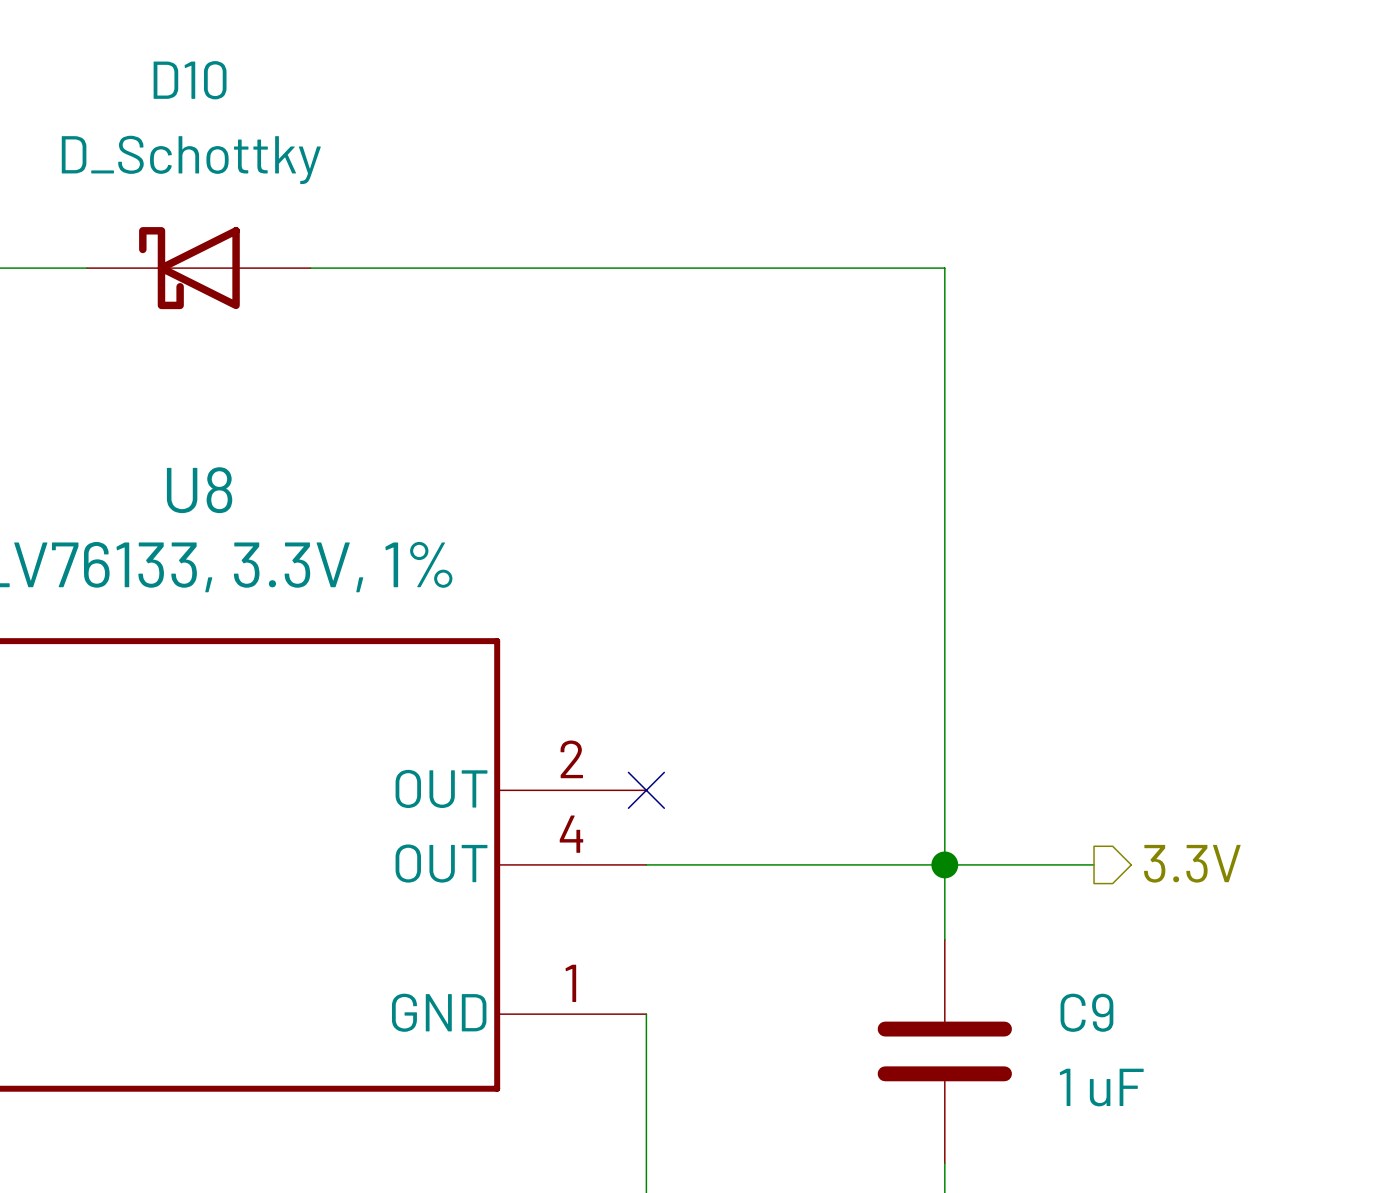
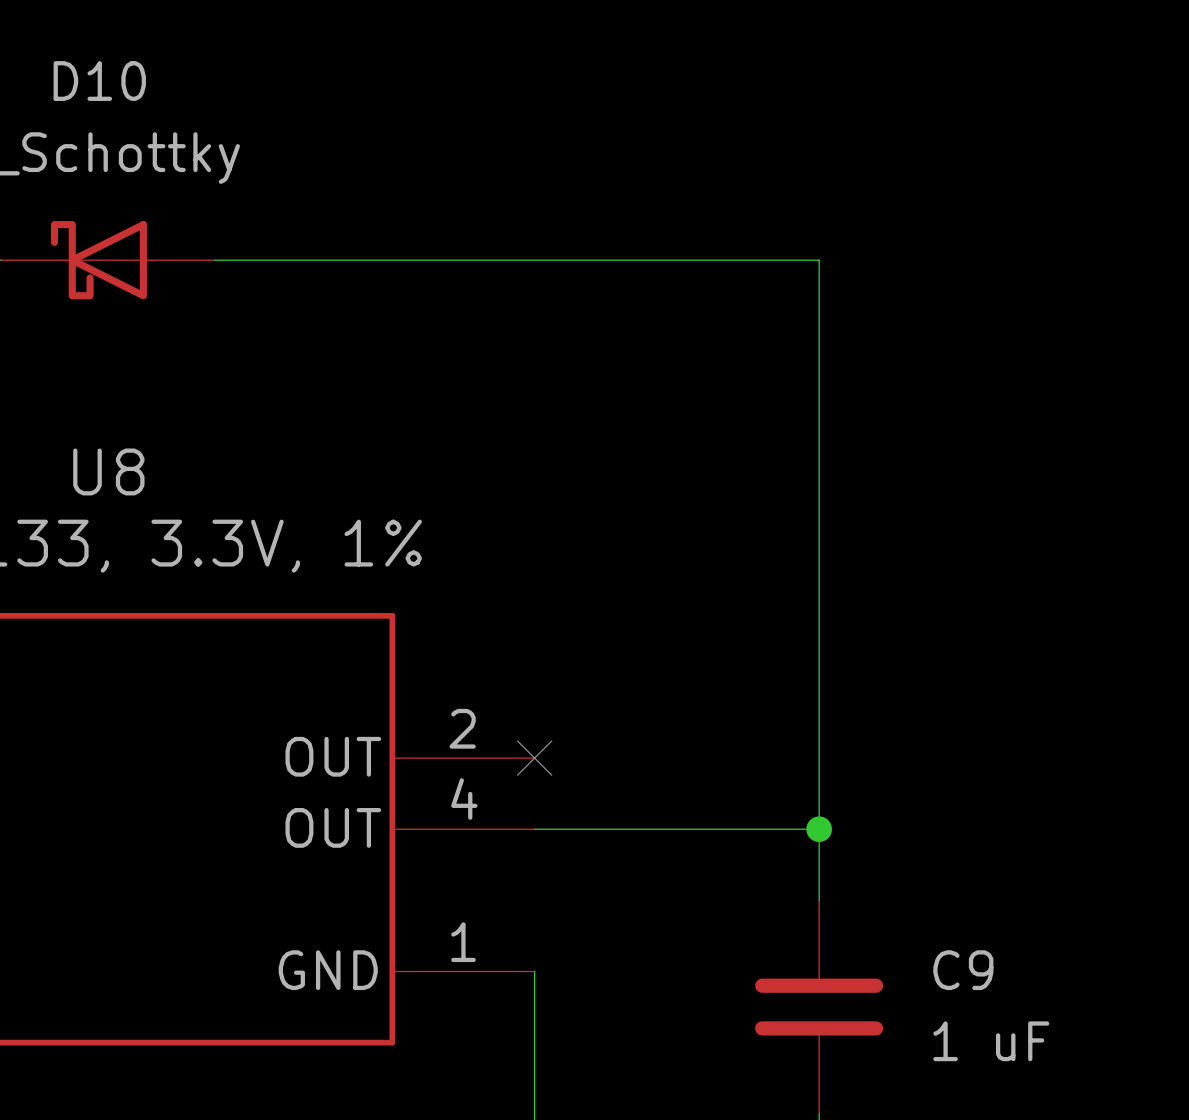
hierarchical label: 3.3V (1192, 863) -> none
wire: (944, 864) (1094, 864) -> none

